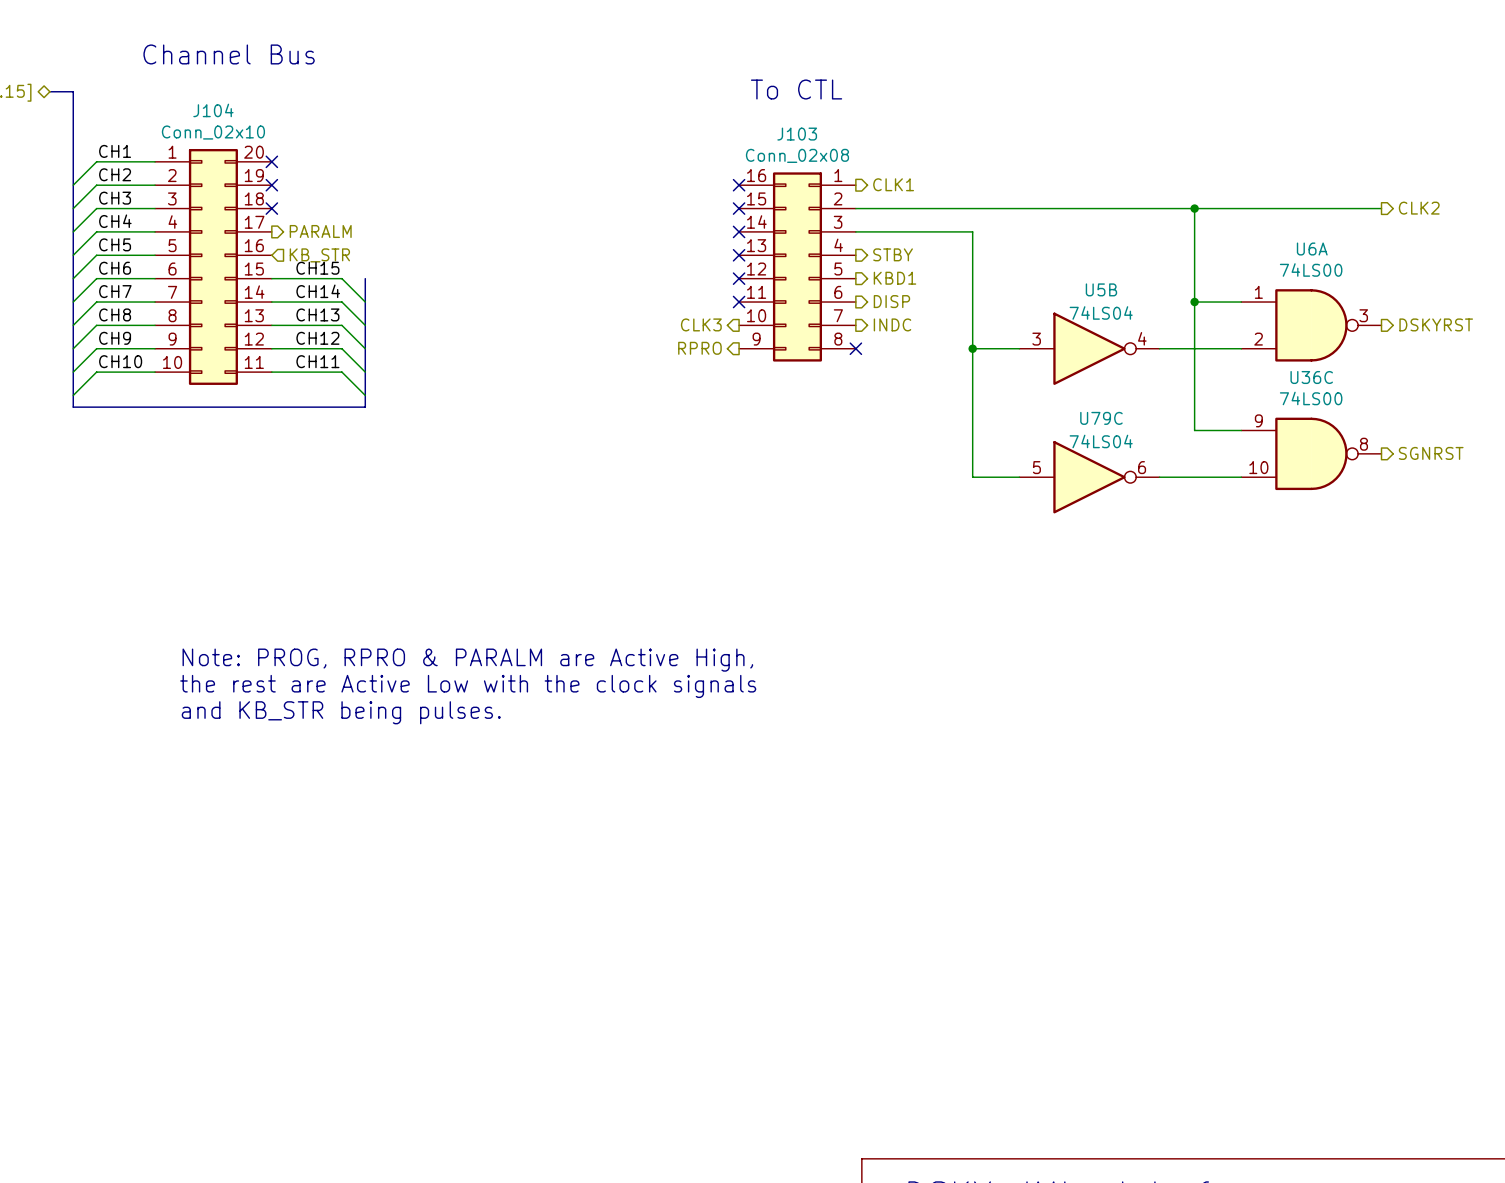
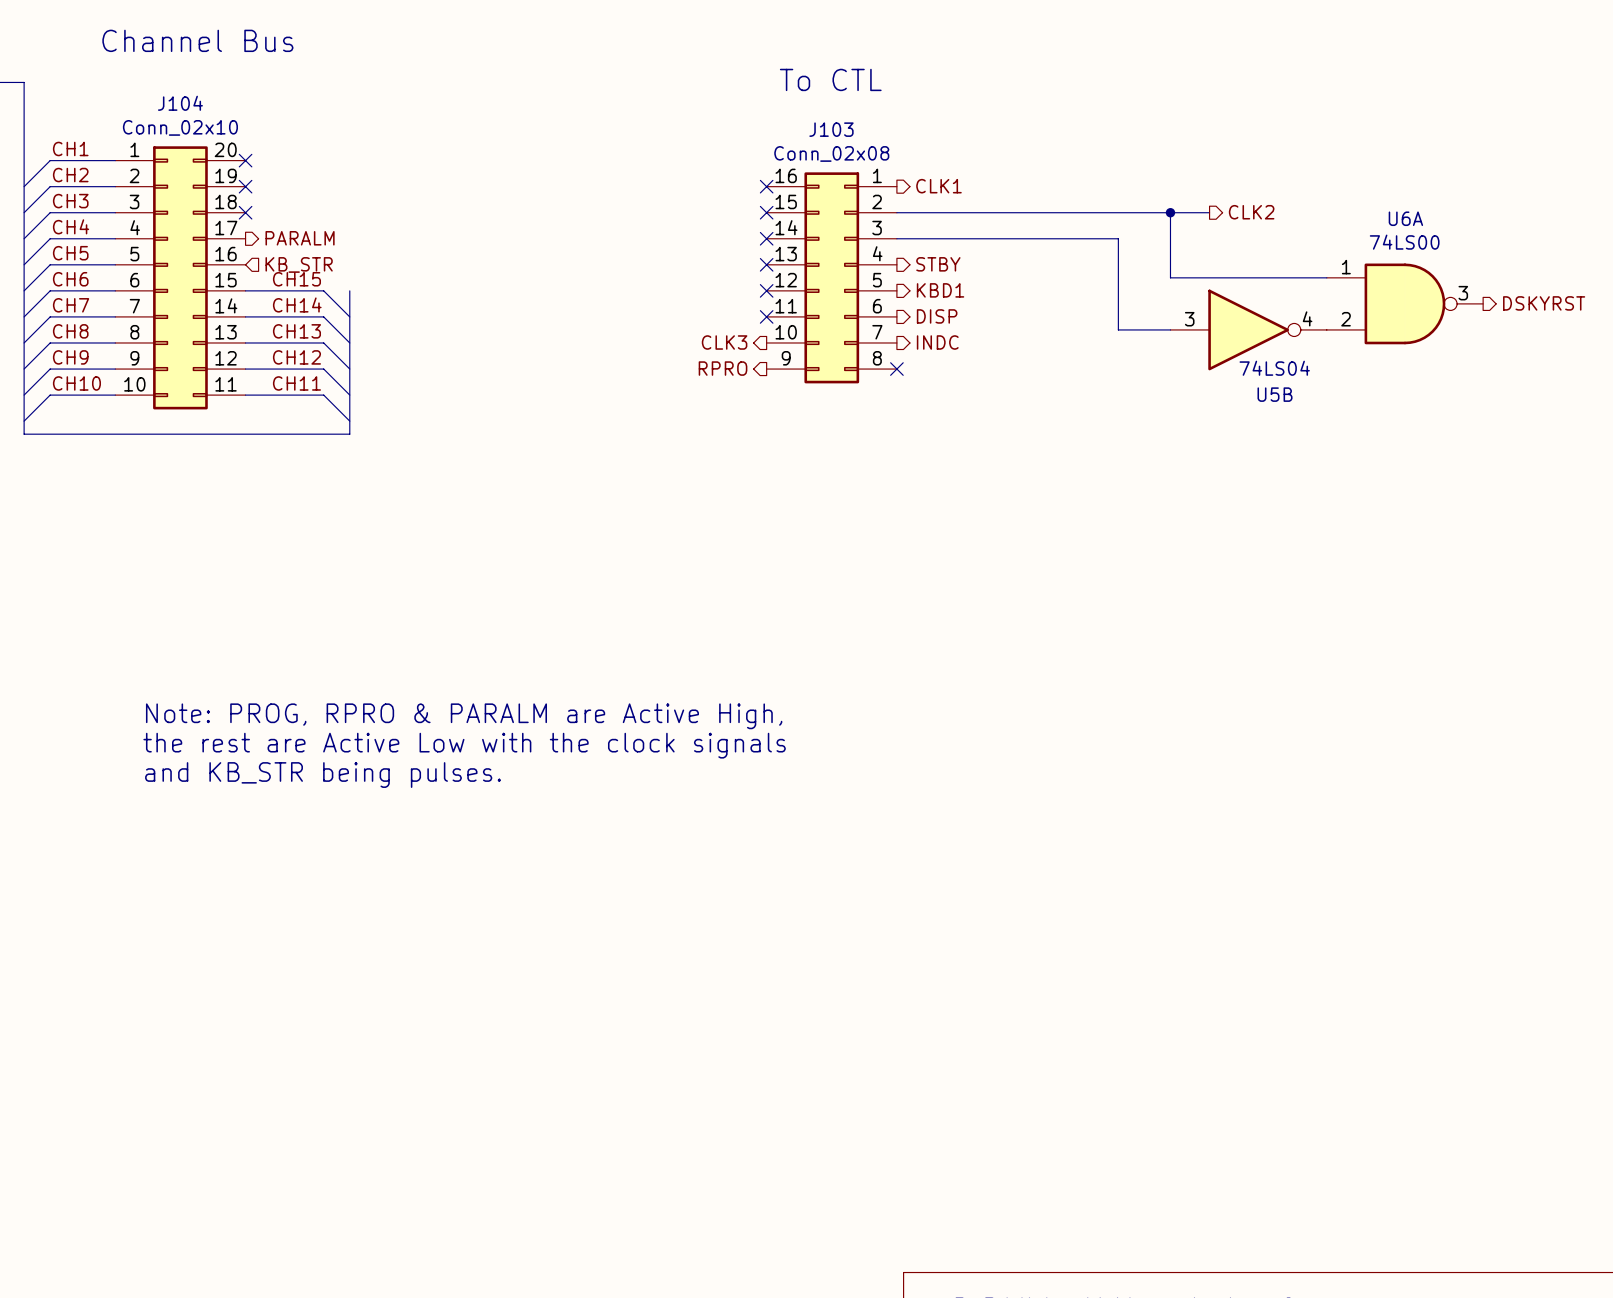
wire: none -> (1170, 212) (1170, 277) (1326, 277)
junction: none -> (1170, 212)
wire: (1136, 208) (1381, 208) -> none
hierarchical label: none -> CLK2 (1251, 212)
wire: (1194, 208) (1194, 430) (1241, 430) -> none
junction: (1194, 208) -> none
hierarchical label: CLK2 (1419, 208) -> none
wire: (972, 231) (972, 477) (1019, 477) -> (1027, 238) (1118, 238) (1118, 329) (1170, 329)
U5B name position: U5B (1101, 289) -> U5B (1275, 394)
wire: (1194, 302) (1241, 302) -> none
junction: (1194, 302) -> none
U5B value position: 74LS04 (1101, 312) -> 74LS04 (1274, 368)
hierarchical label position: DSKYRST (1436, 324) -> DSKYRST (1544, 303)
U6A position: (1311, 325) -> (1404, 303)
wire: (972, 348) (1019, 348) -> none
junction: (972, 348) -> none
U5B position: (1089, 348) -> (1248, 329)
wire: (1159, 348) (1241, 348) -> none
U36C: 74LS00 (1311, 453) -> none
hierarchical label: SGNRST (1431, 453) -> none
U79C: 74LS04 (1089, 477) -> none
wire: (1159, 477) (1241, 477) -> none

